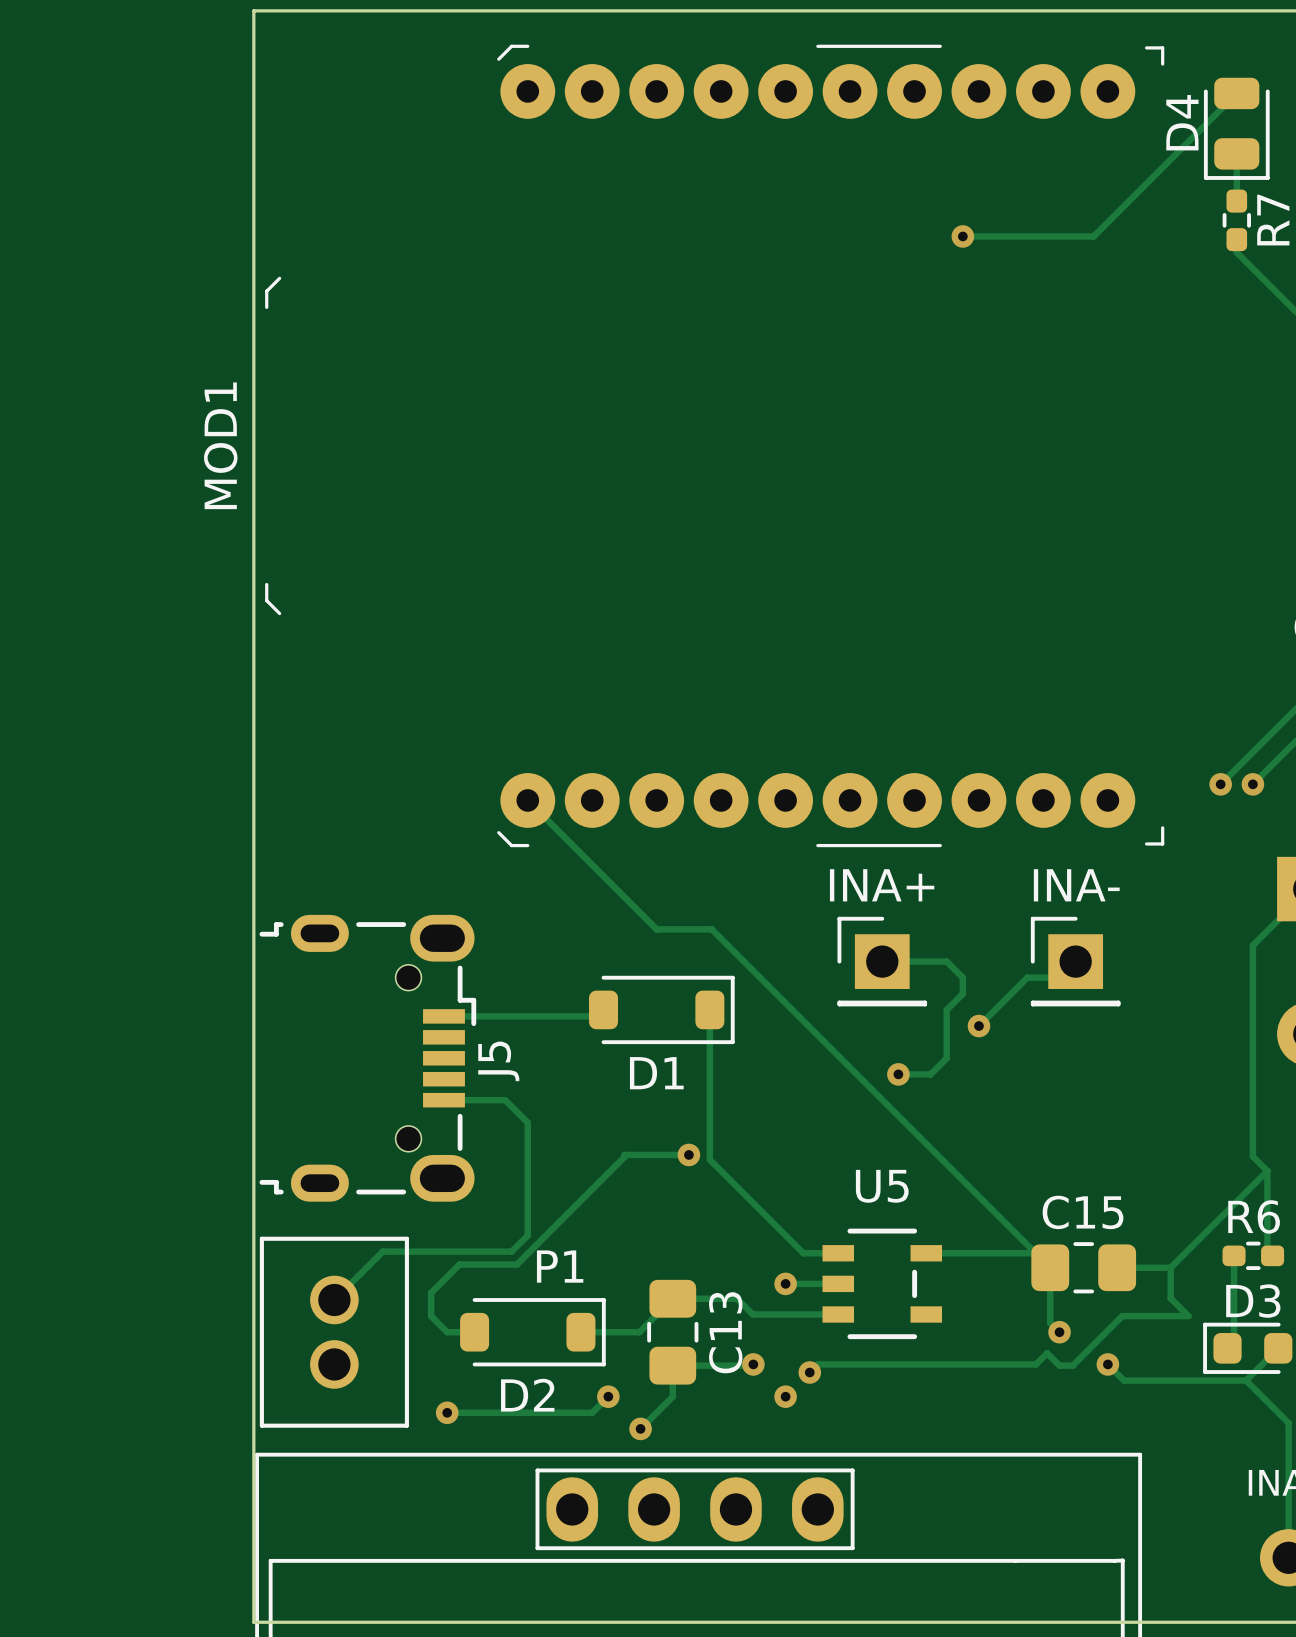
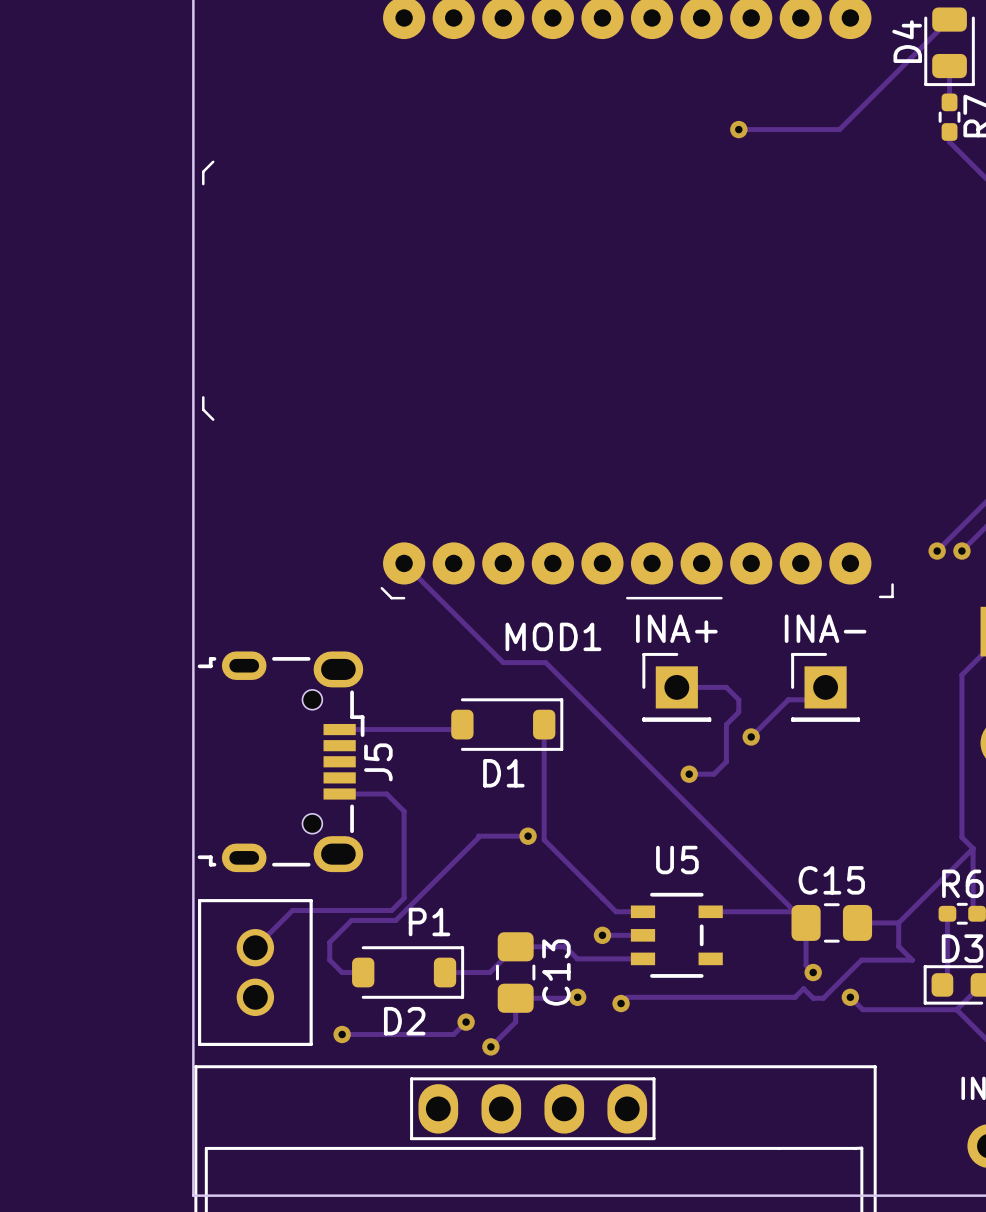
MOD1 name rotation: 0° (220, 445) -> 90° clockwise (553, 636)
MOD1 name position: MOD1 (220, 445) -> MOD1 (553, 636)
via: (785, 1396) -> none

